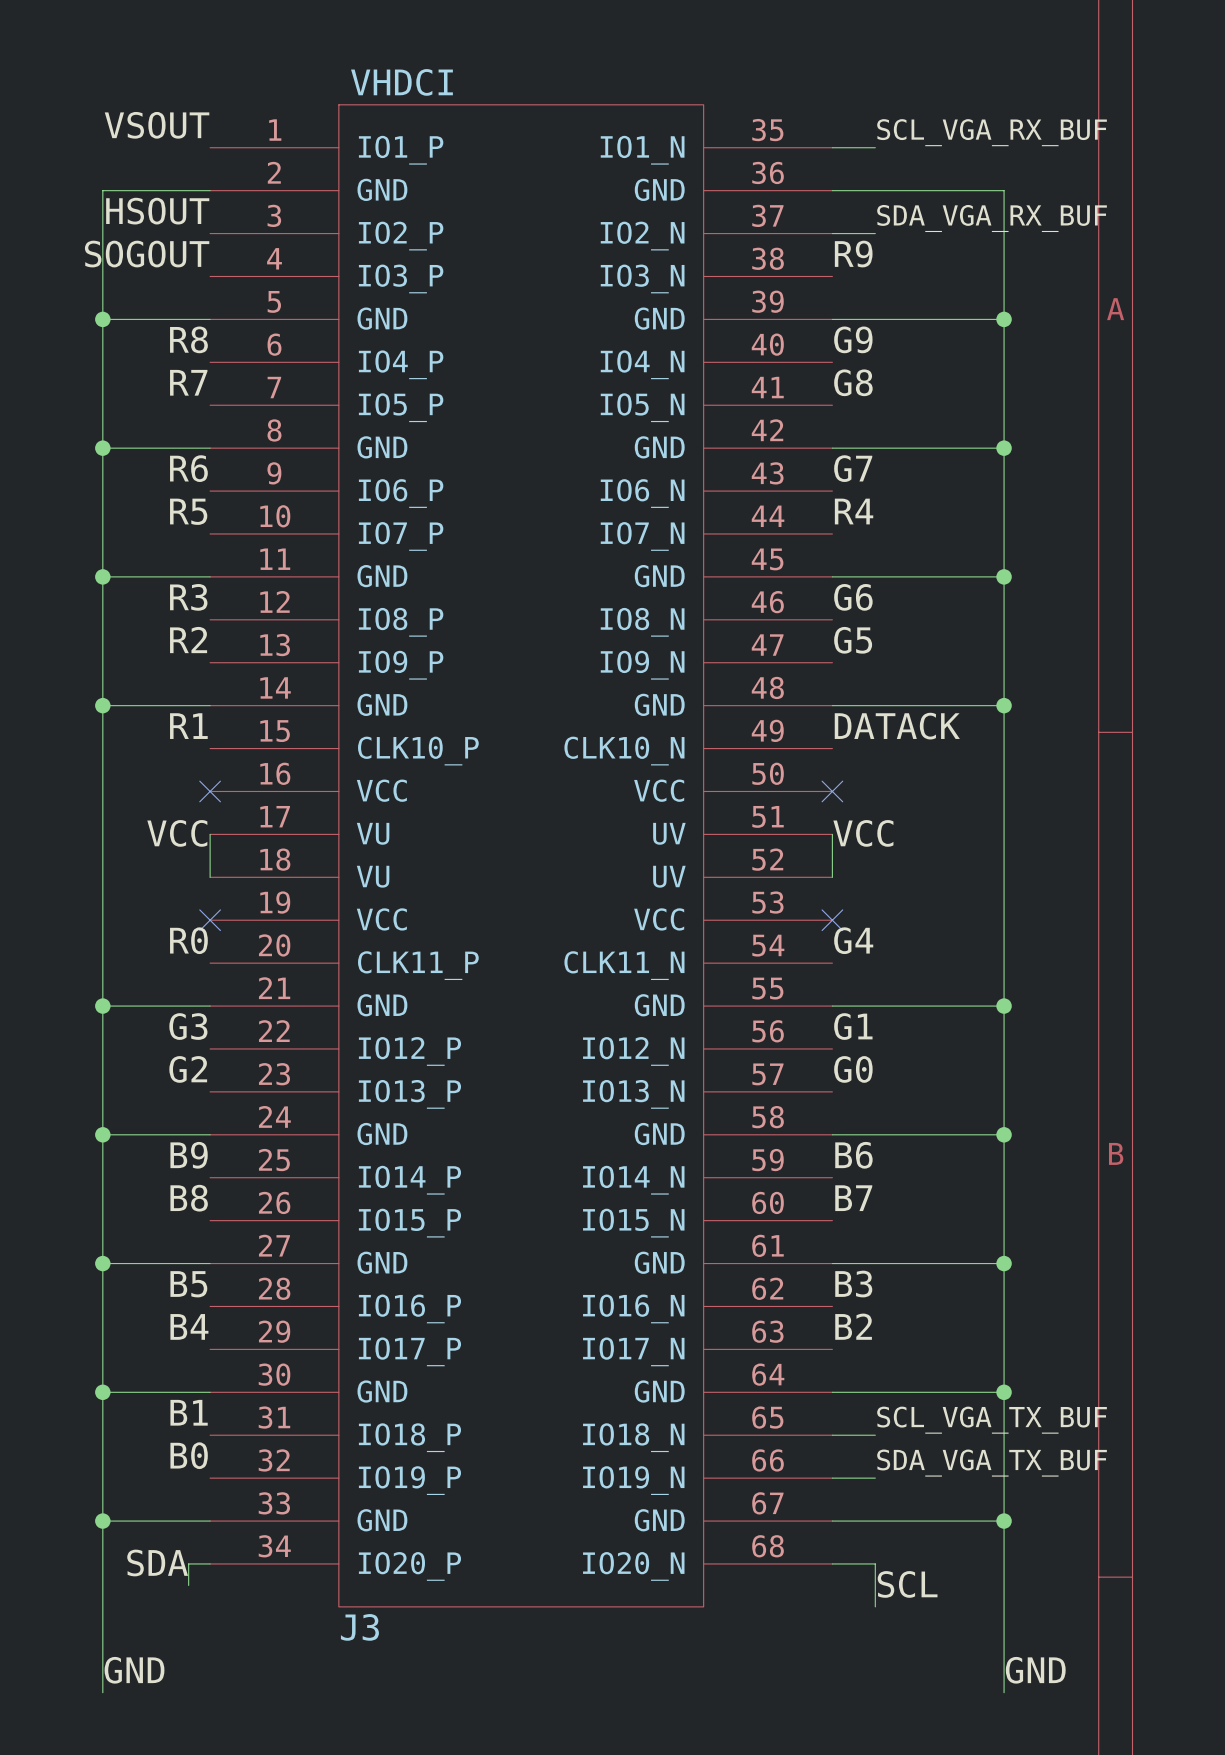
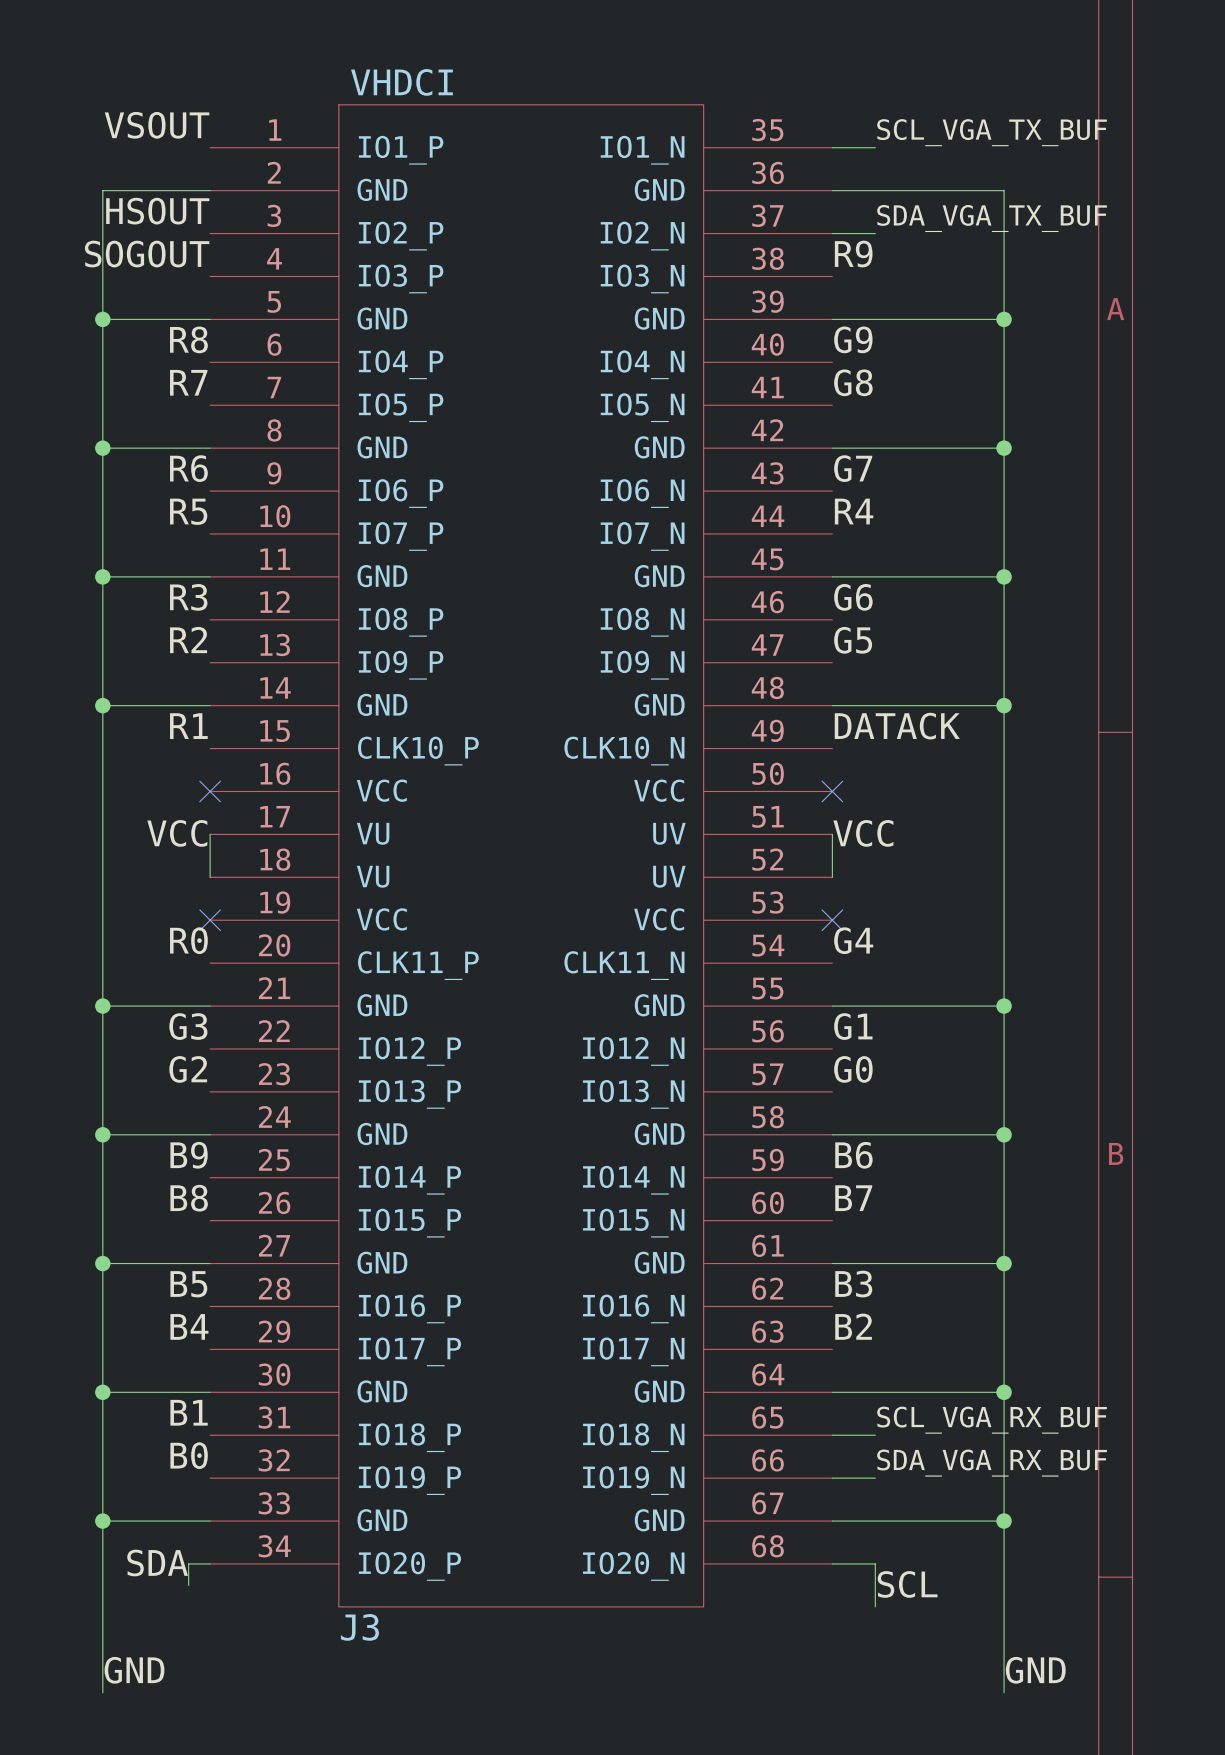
label: SCL_VGA_RX_BUF (992, 132) -> SCL_VGA_TX_BUF (992, 132)
label: SDA_VGA_RX_BUF (992, 218) -> SDA_VGA_TX_BUF (992, 218)
label: SCL_VGA_TX_BUF (992, 1420) -> SCL_VGA_RX_BUF (992, 1420)
label: SDA_VGA_TX_BUF (992, 1463) -> SDA_VGA_RX_BUF (992, 1463)

